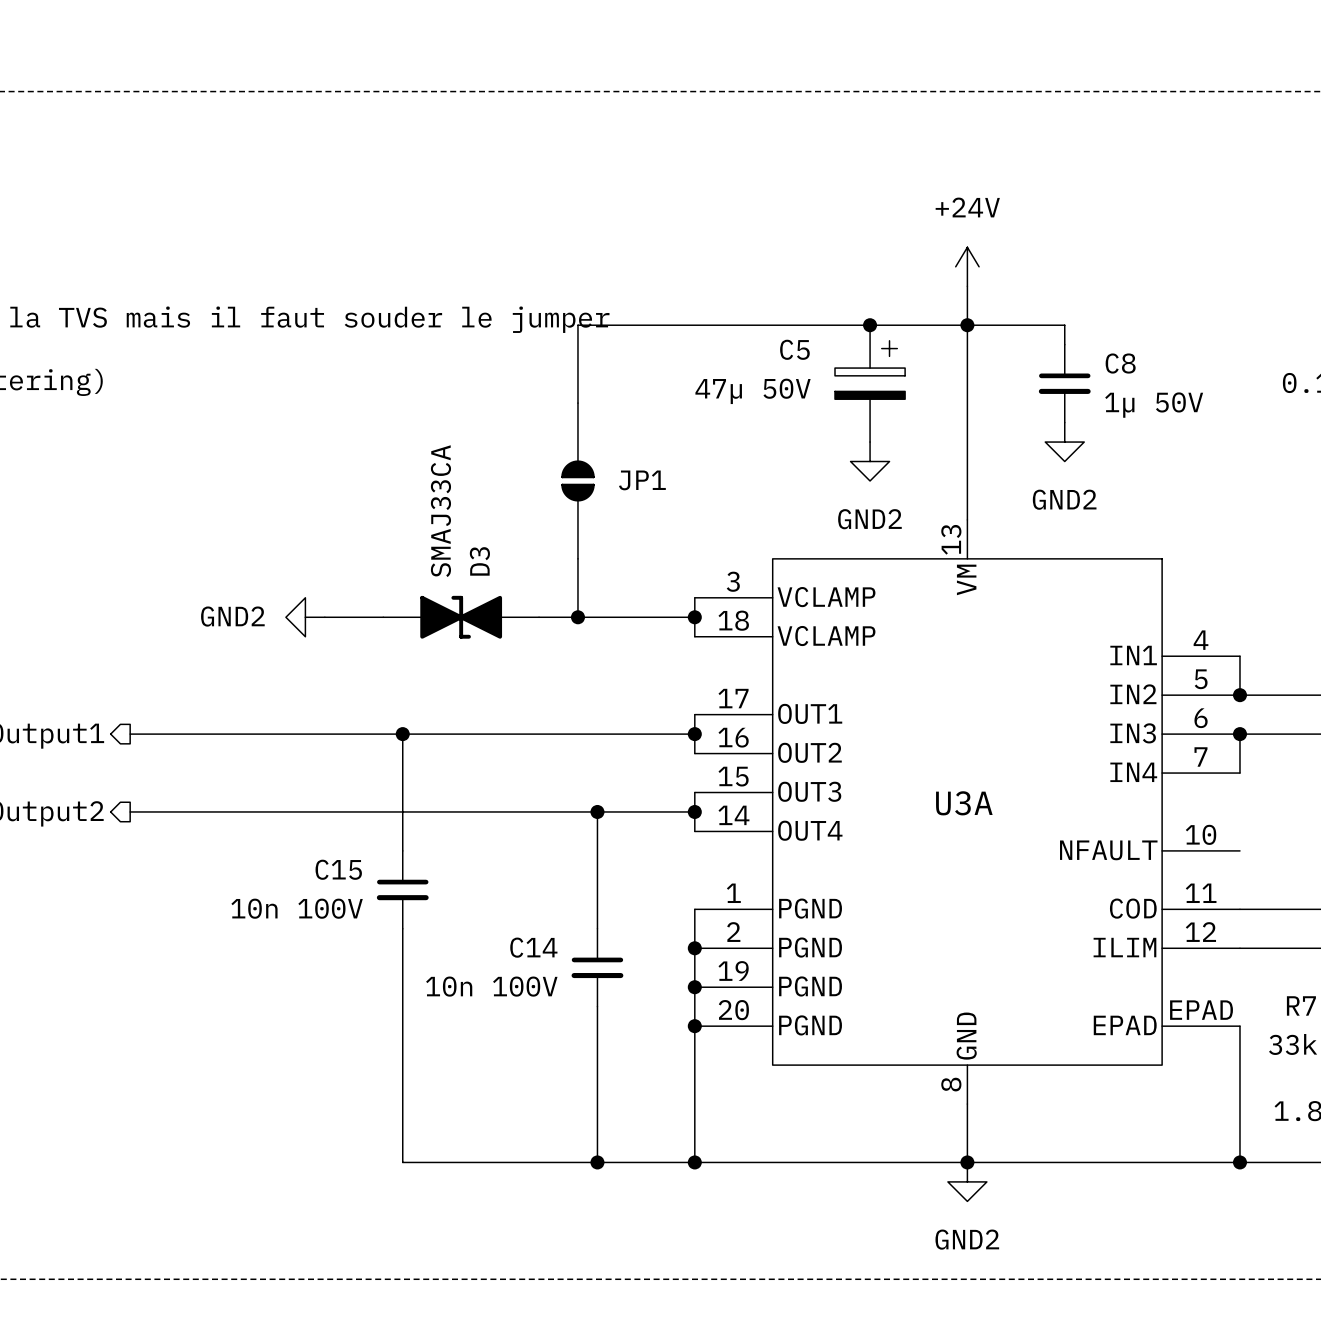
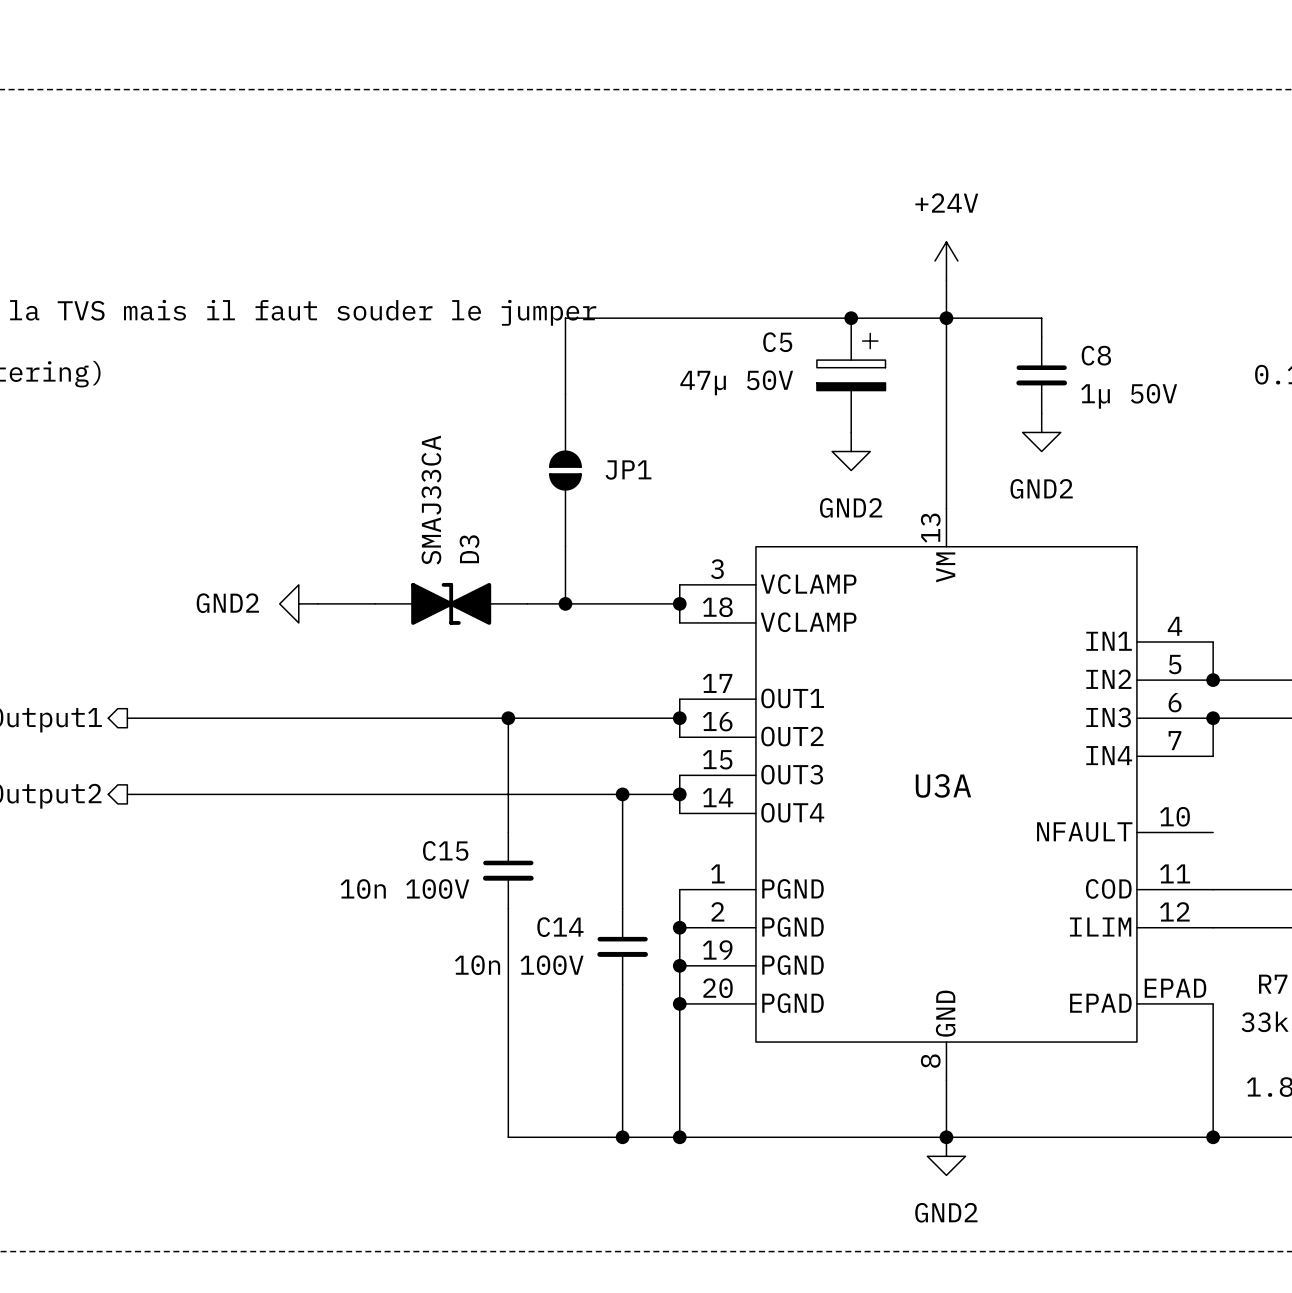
wire: (402, 734) (402, 850) -> (508, 718) (508, 832)
junction: (402, 734) -> none
junction: none -> (508, 718)
wire: (597, 811) (597, 928) -> (622, 794) (622, 908)
junction position: (597, 811) -> (622, 794)
C15 position: (402, 889) -> (508, 870)
wire: (402, 928) (402, 1162) (519, 1162) -> (508, 908) (508, 1137)
C14 position: (597, 967) -> (622, 946)
wire: (597, 1006) (597, 1162) -> (622, 984) (622, 1137)
junction position: (597, 1162) -> (622, 1137)

